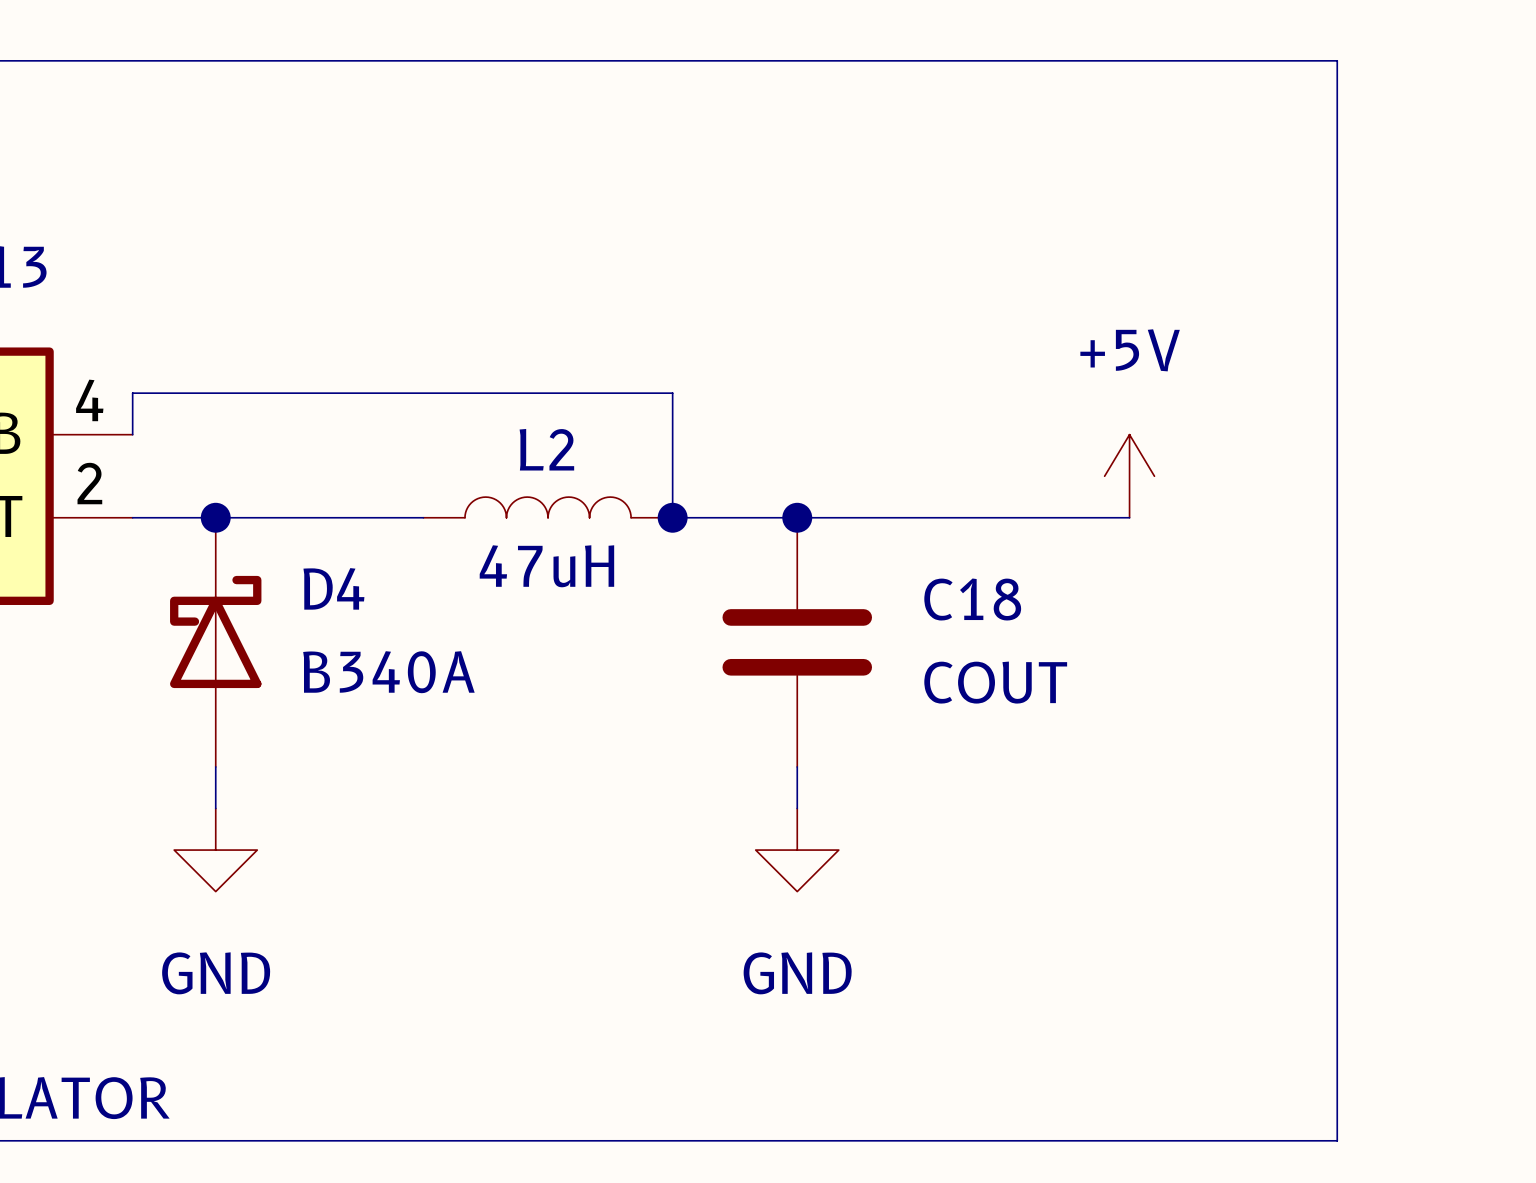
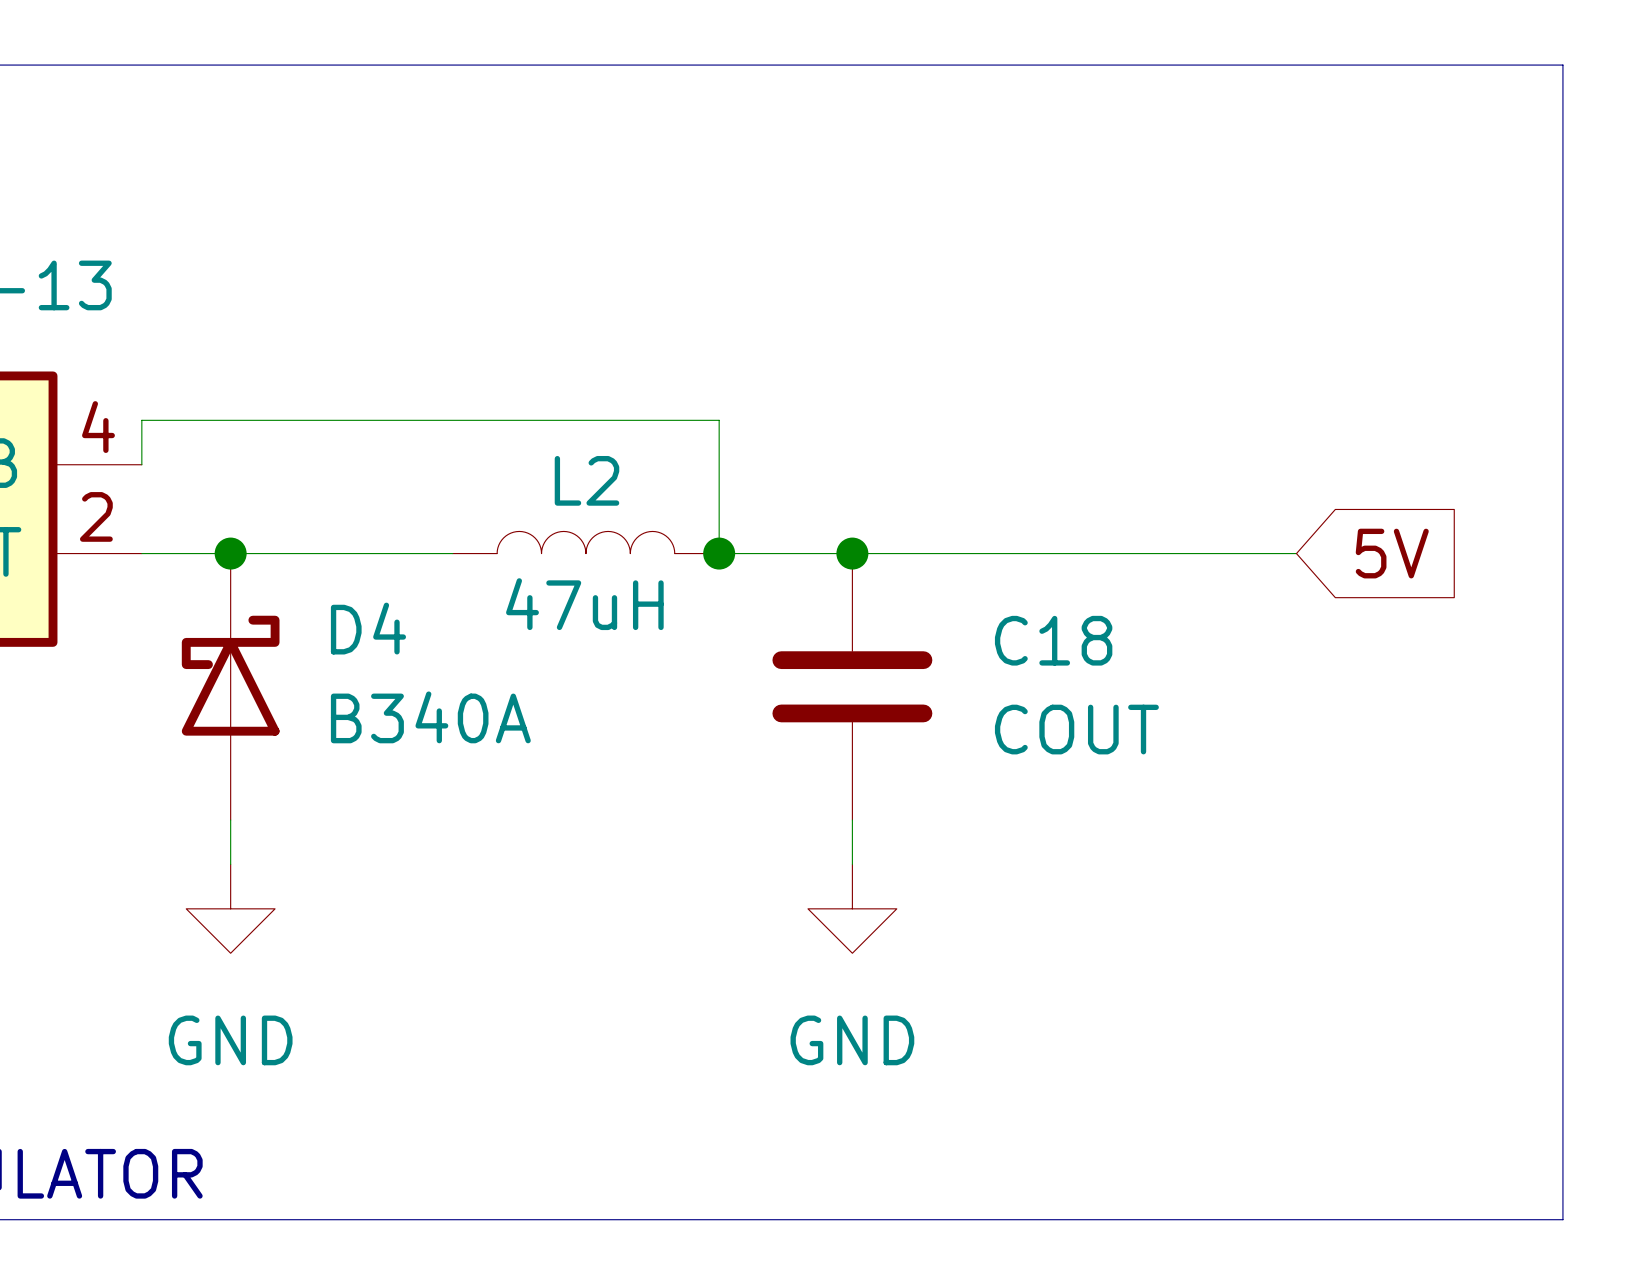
line: (1337, 60) (1337, 1140) -> (1429, 65) (1562, 65) (1562, 1219) (1429, 1219)
power symbol: +5V (1129, 476) -> none
wire: none -> (1207, 553) (1296, 553)
global label: none -> 5V (1392, 553)

